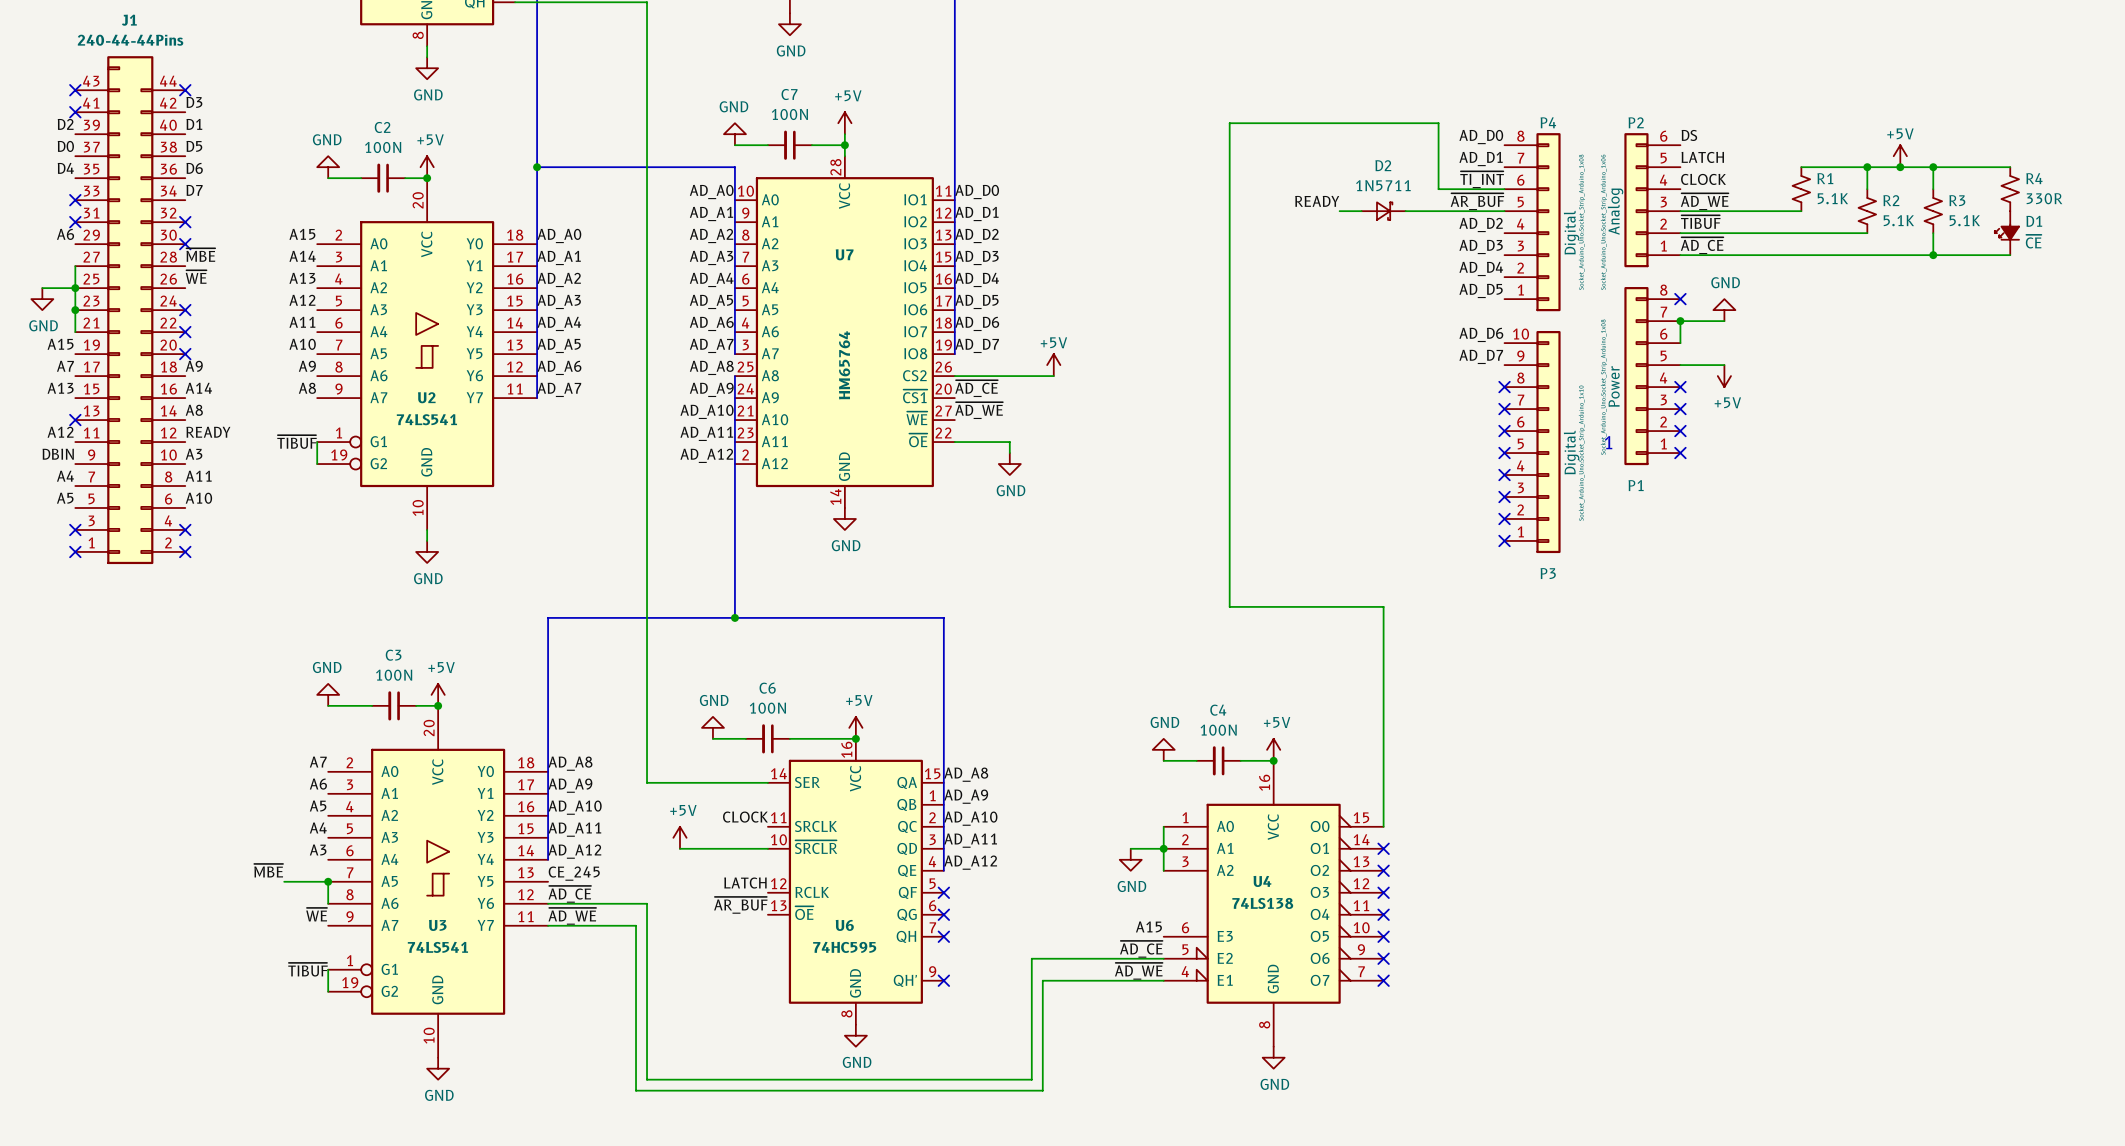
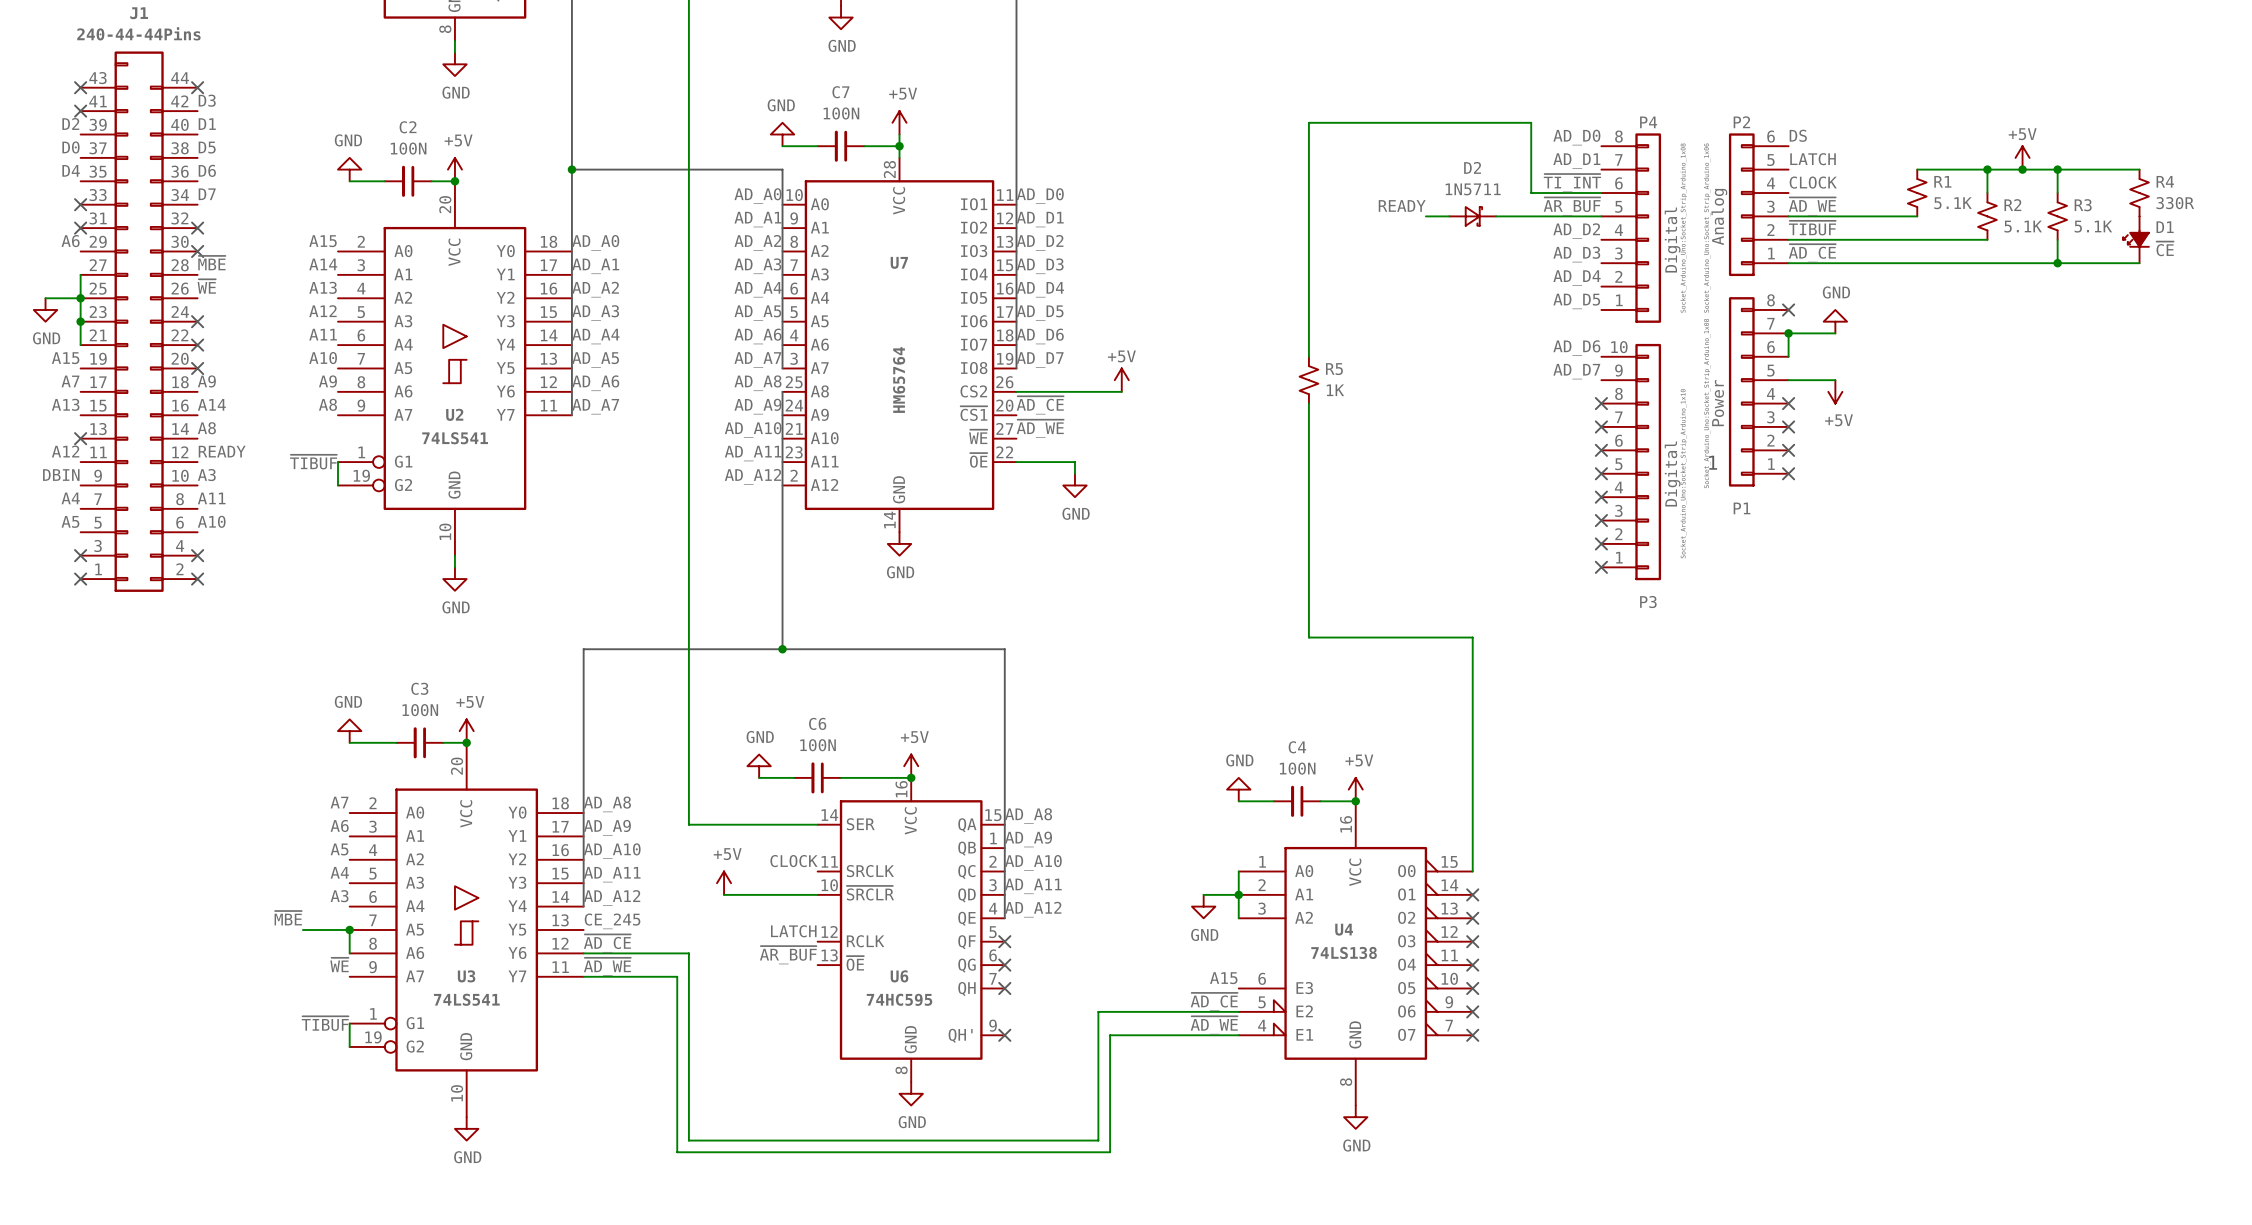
R5: none -> 1K (1308, 380)

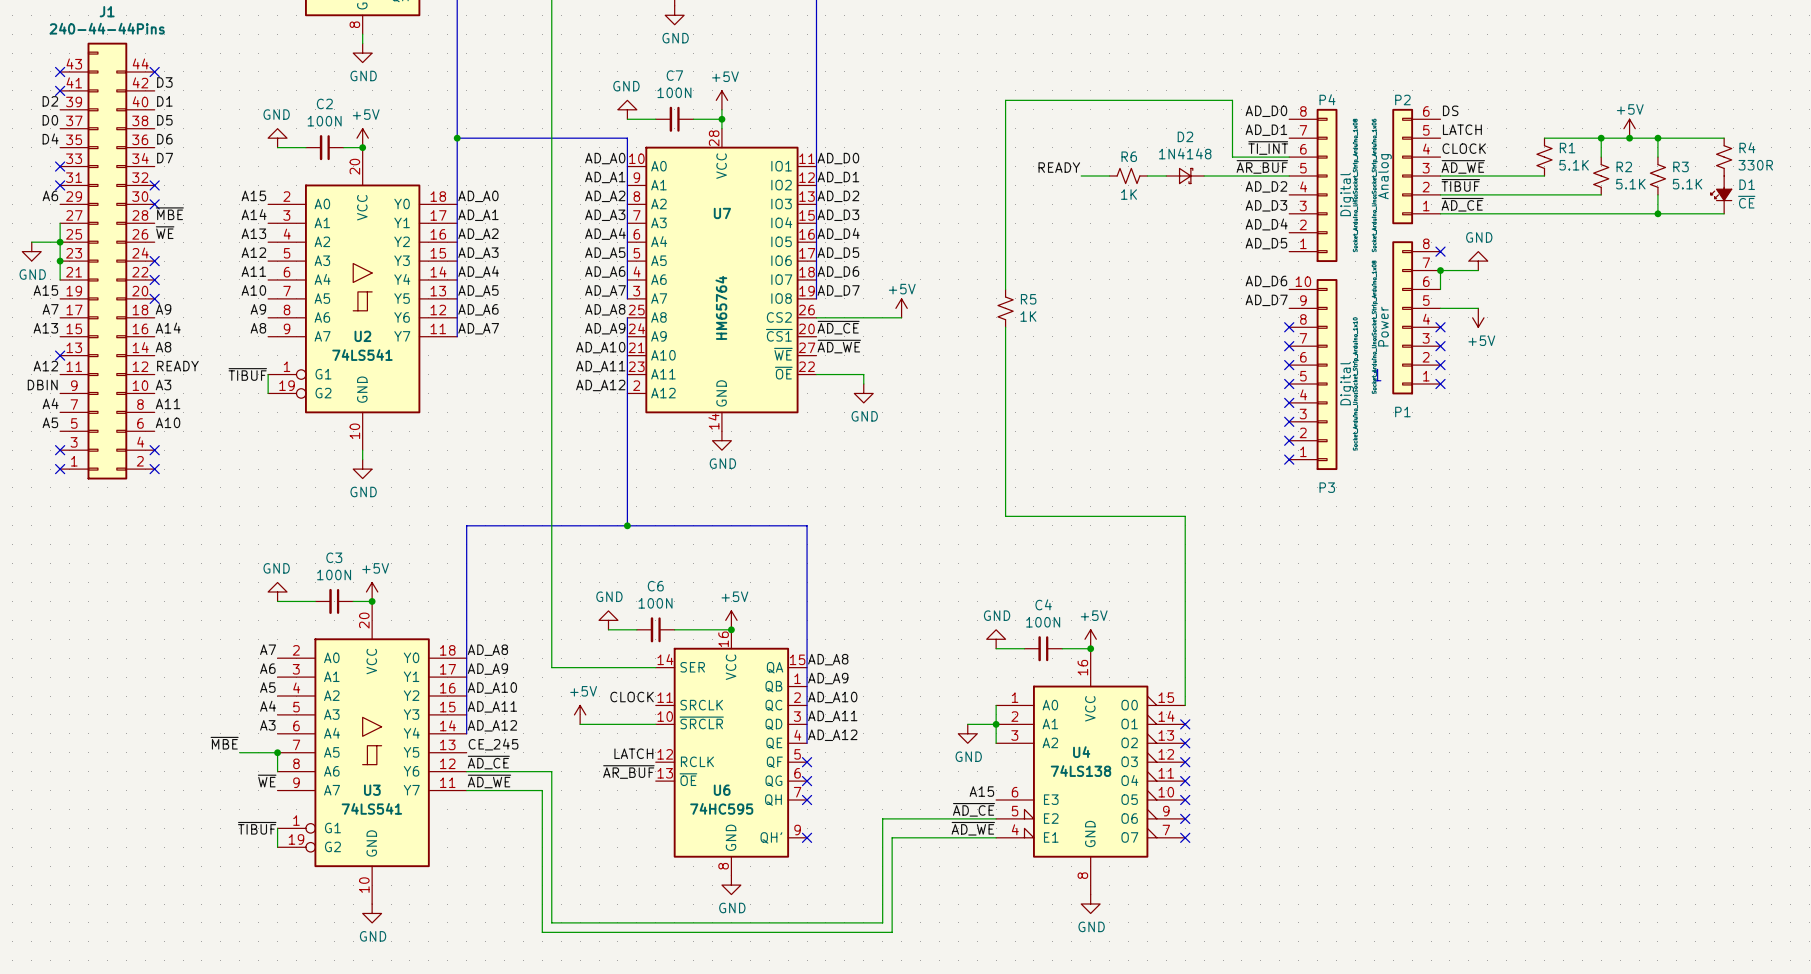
wire: (1308, 122) (1308, 356) -> (1052, 100) (1005, 100) (1005, 289)
D2 value: 1N5711 (1473, 189) -> 1N4148 (1185, 153)
label position: READY (1402, 205) -> READY (1059, 167)
wire: none -> (1081, 175) (1109, 175)
R6: none -> 1K (1128, 175)
R5 position: (1308, 380) -> (1005, 308)
wire: (1308, 403) (1308, 637) -> (1005, 327) (1005, 516) (1052, 516)

